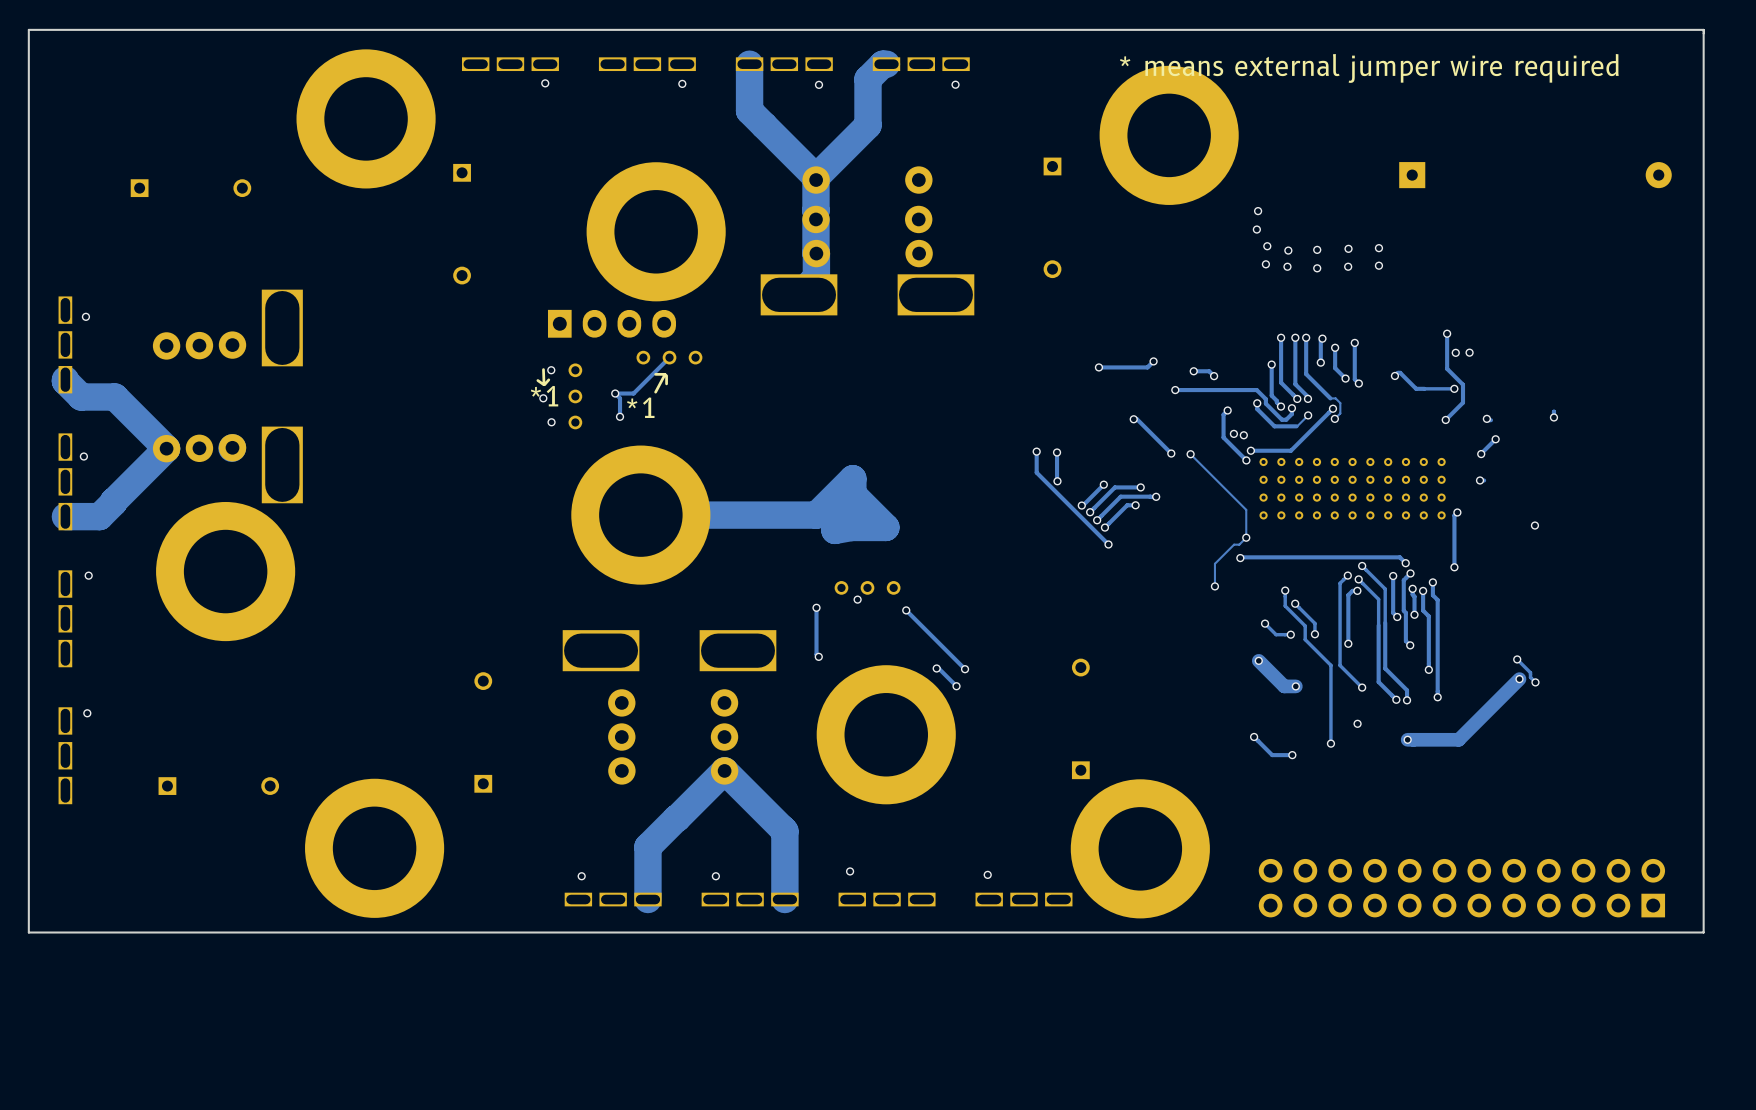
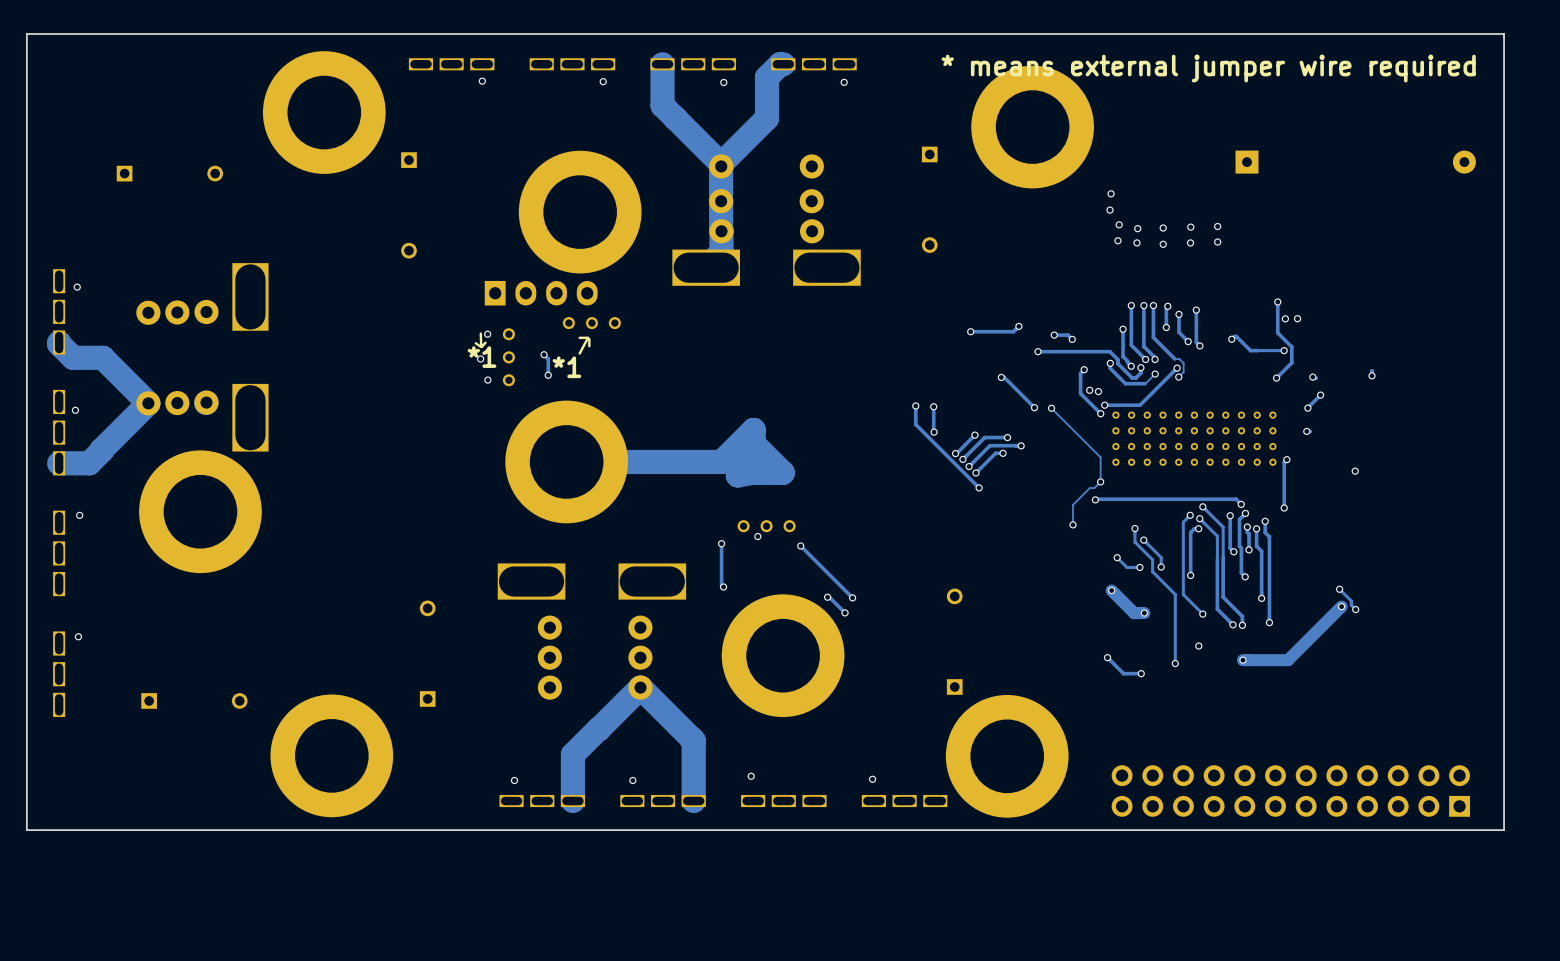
track: (669, 357) (633, 393) (615, 393) -> none

